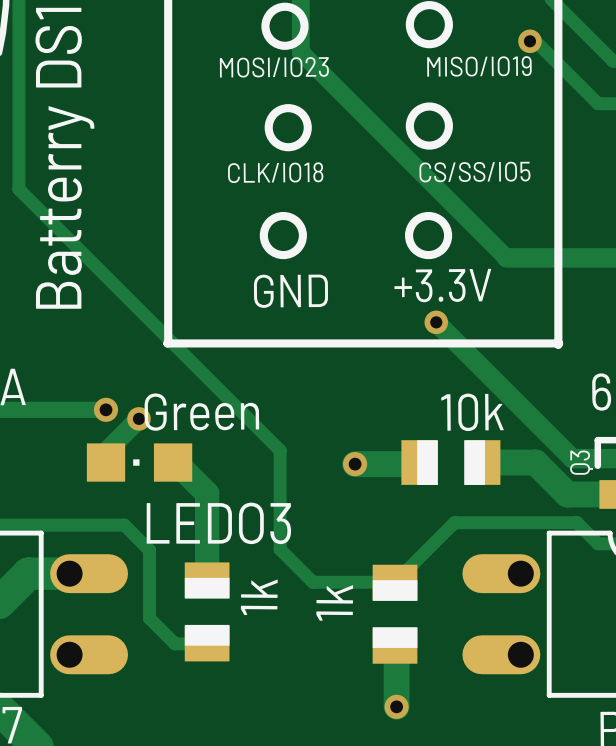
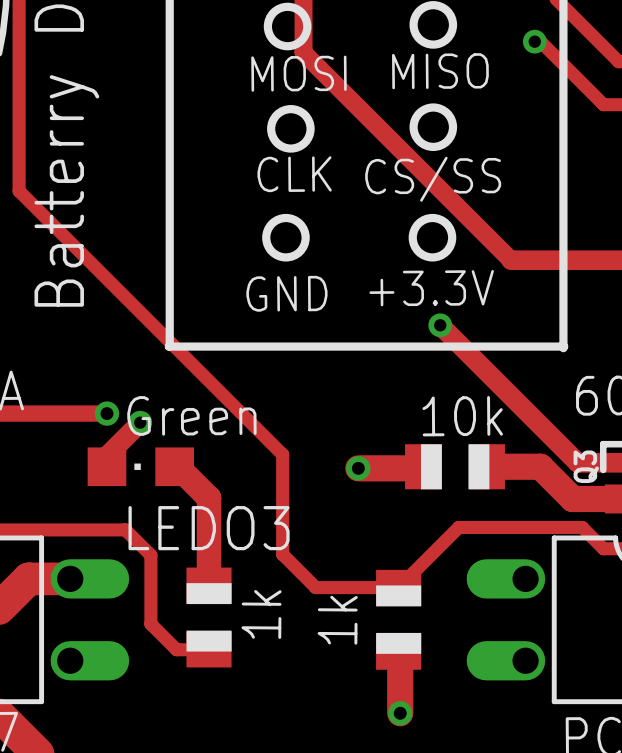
text: MISO/IO19 (479, 66) -> MISO (440, 71)
text: MOSI/IO23 (274, 67) -> MOSI (298, 73)
text: CLK/IO18 (275, 172) -> CLK (294, 174)
text: CS/SS/IO5 (474, 172) -> CS/SS (433, 179)

